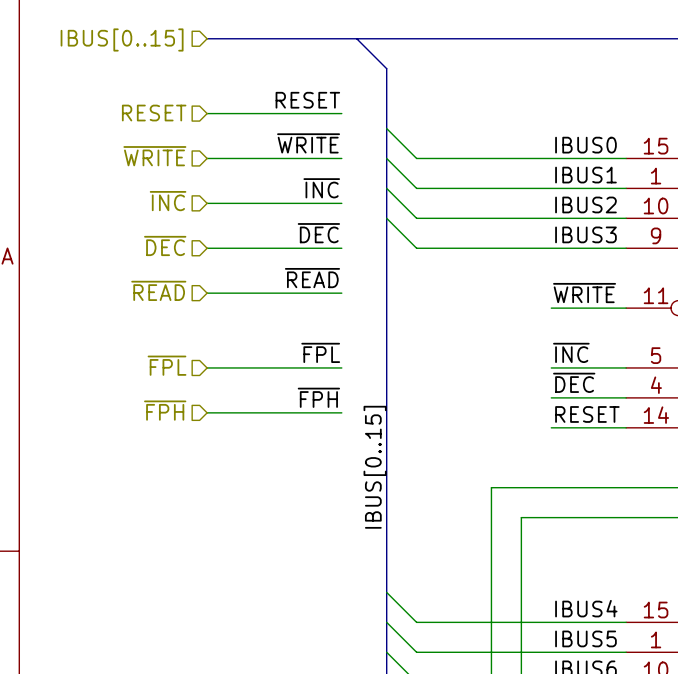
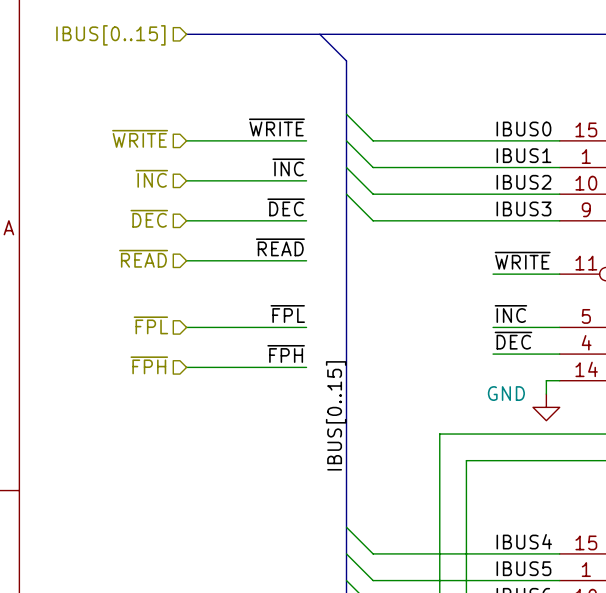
label: RESET (307, 100) -> none
hierarchical label: RESET (154, 113) -> none
wire: (207, 113) (341, 113) -> none
label: RESET (587, 414) -> none
wire: (551, 427) (611, 427) -> (546, 394) (546, 380)
power symbol: none -> GND (546, 407)

